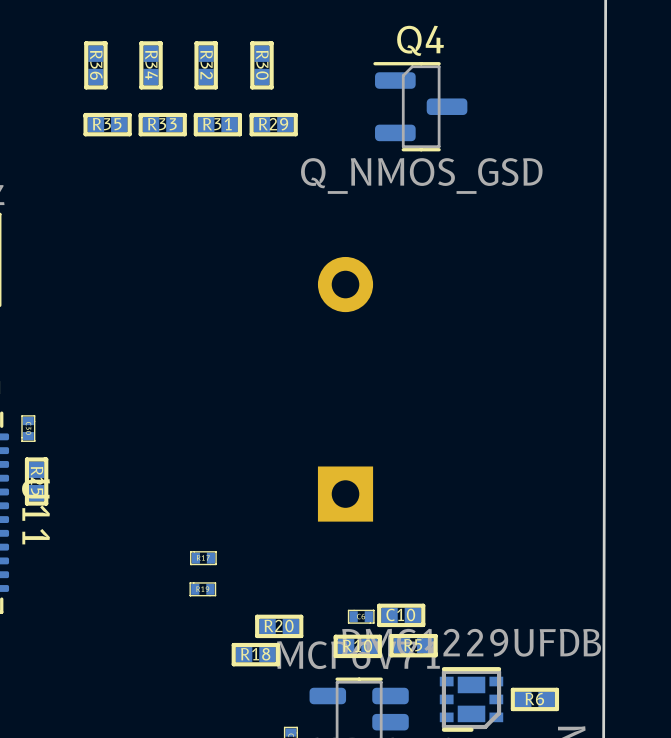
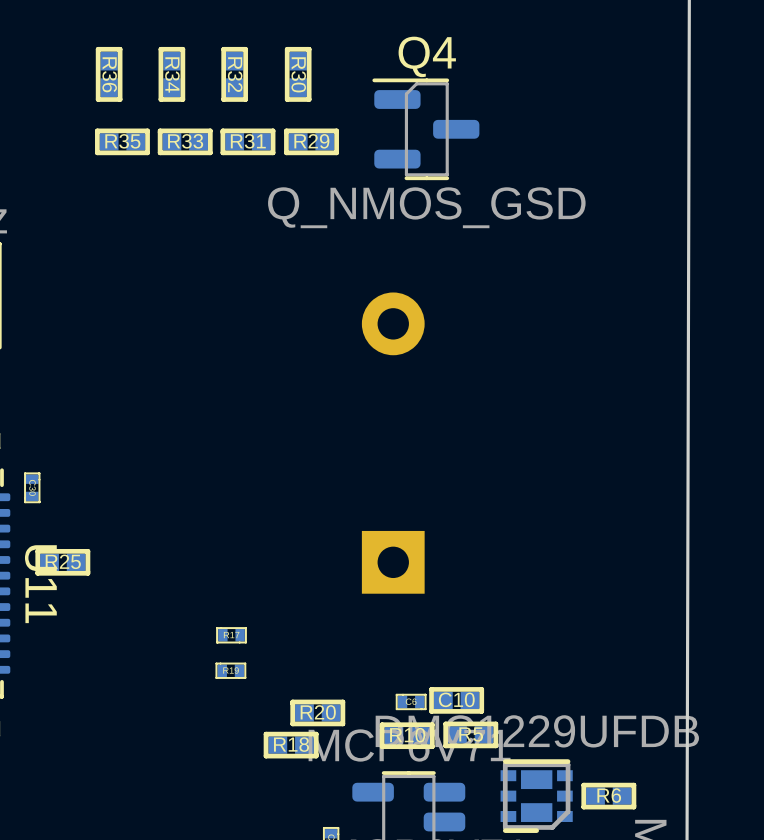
Q4 position: (420, 106) -> (425, 129)
R25 rotation: 0° (36, 481) -> 90° clockwise (62, 562)

